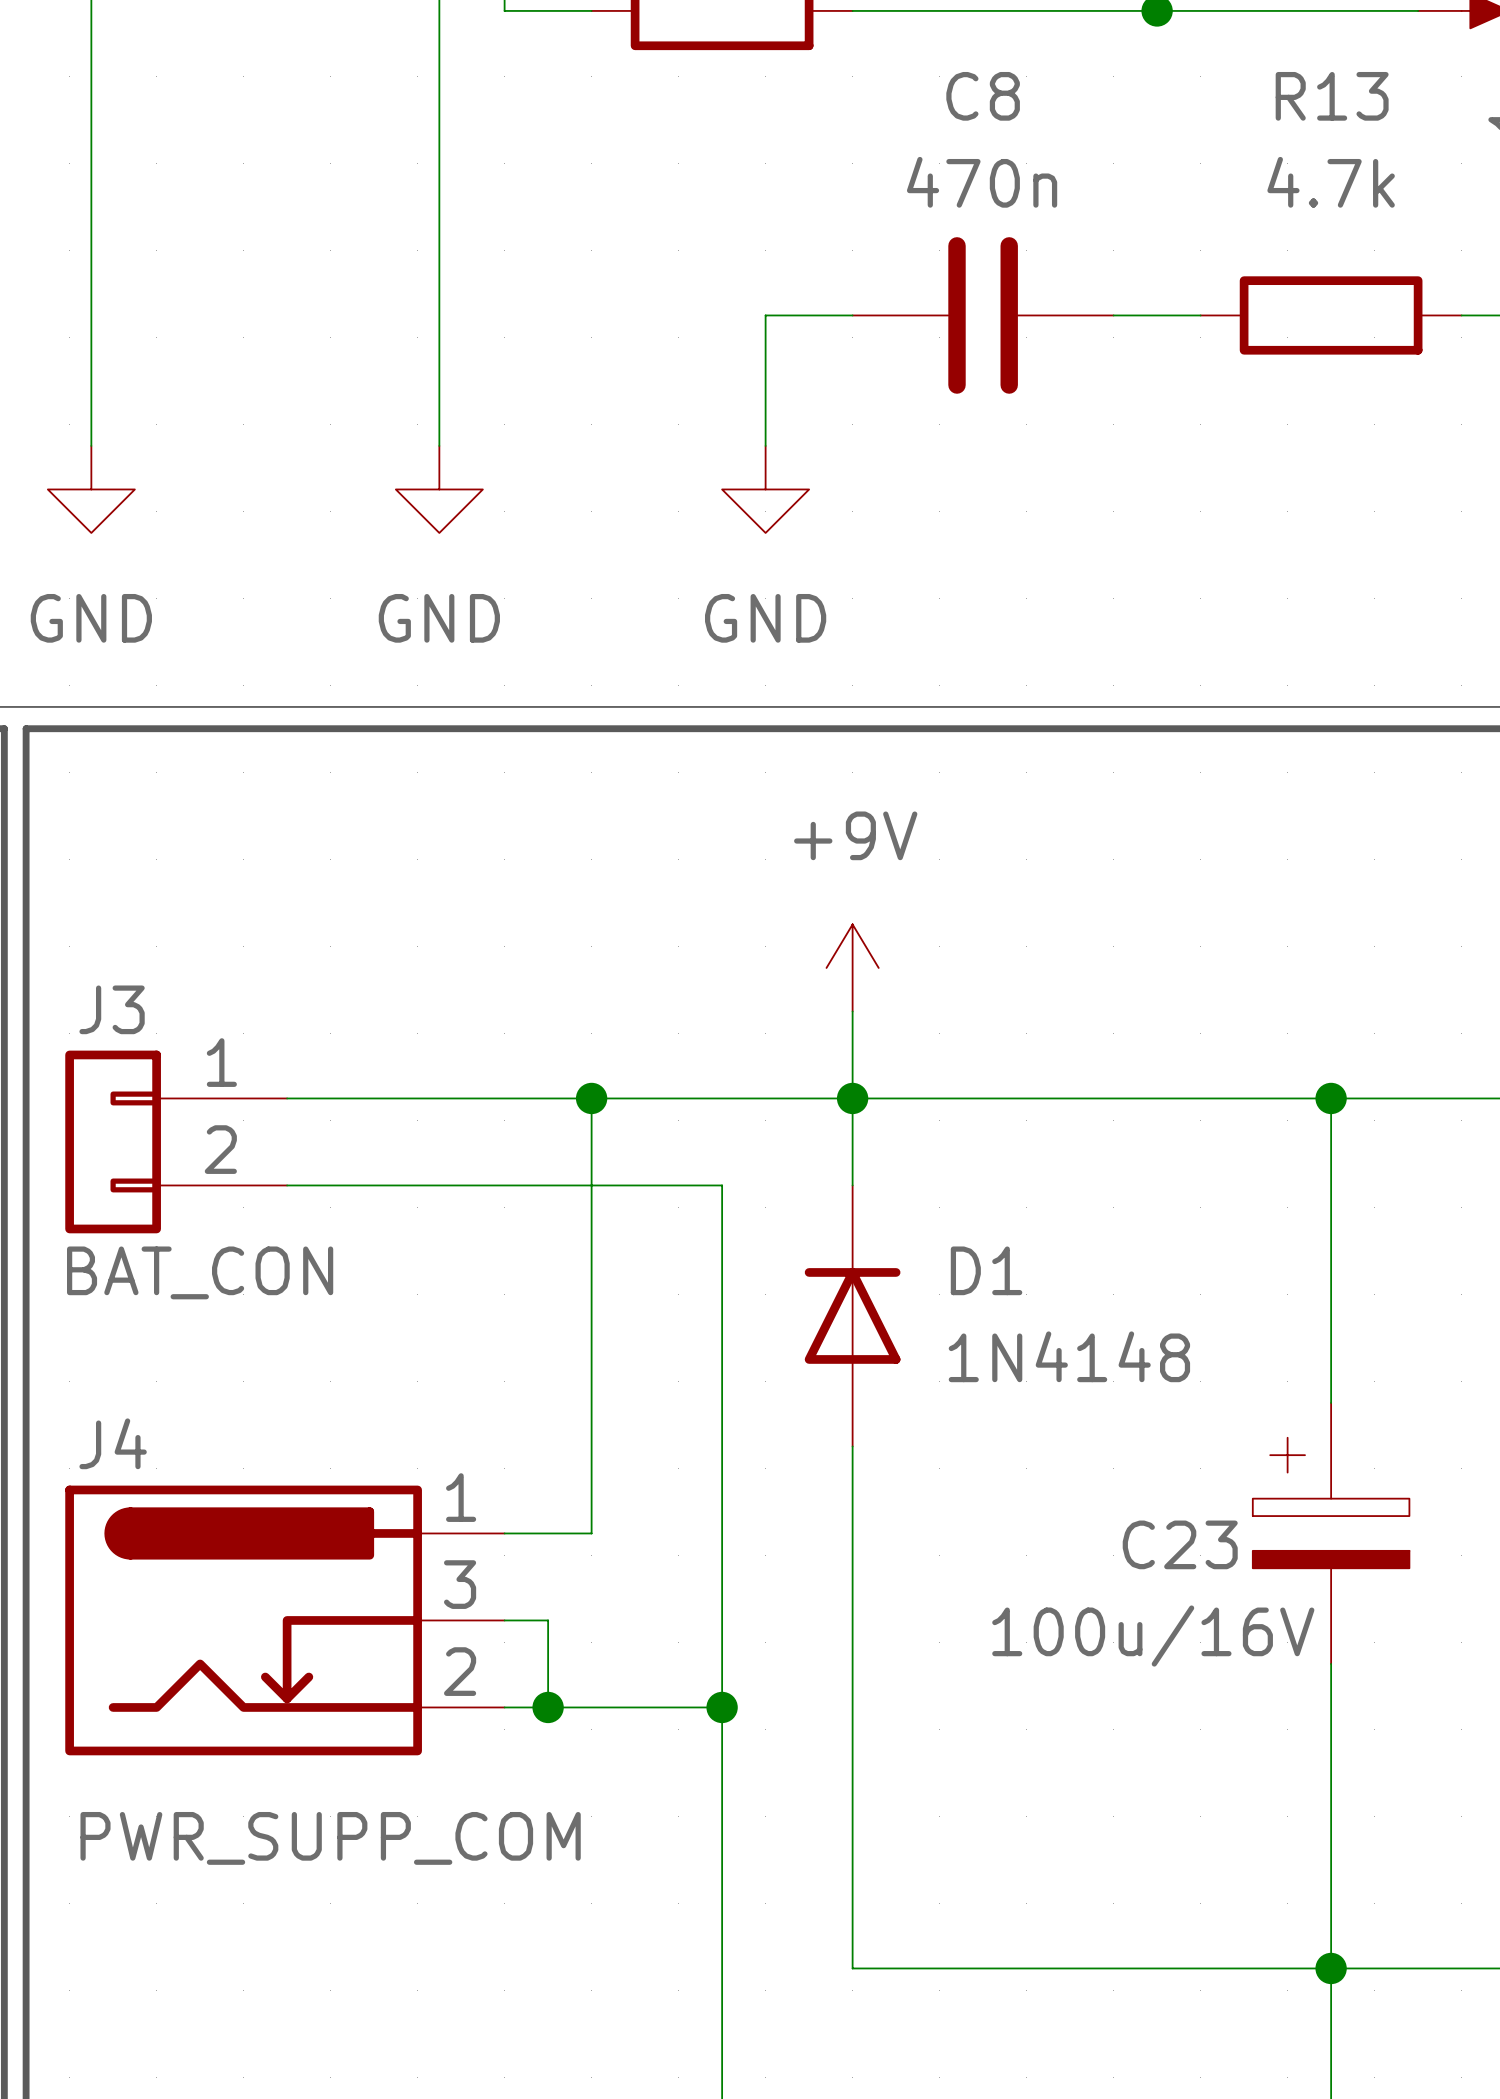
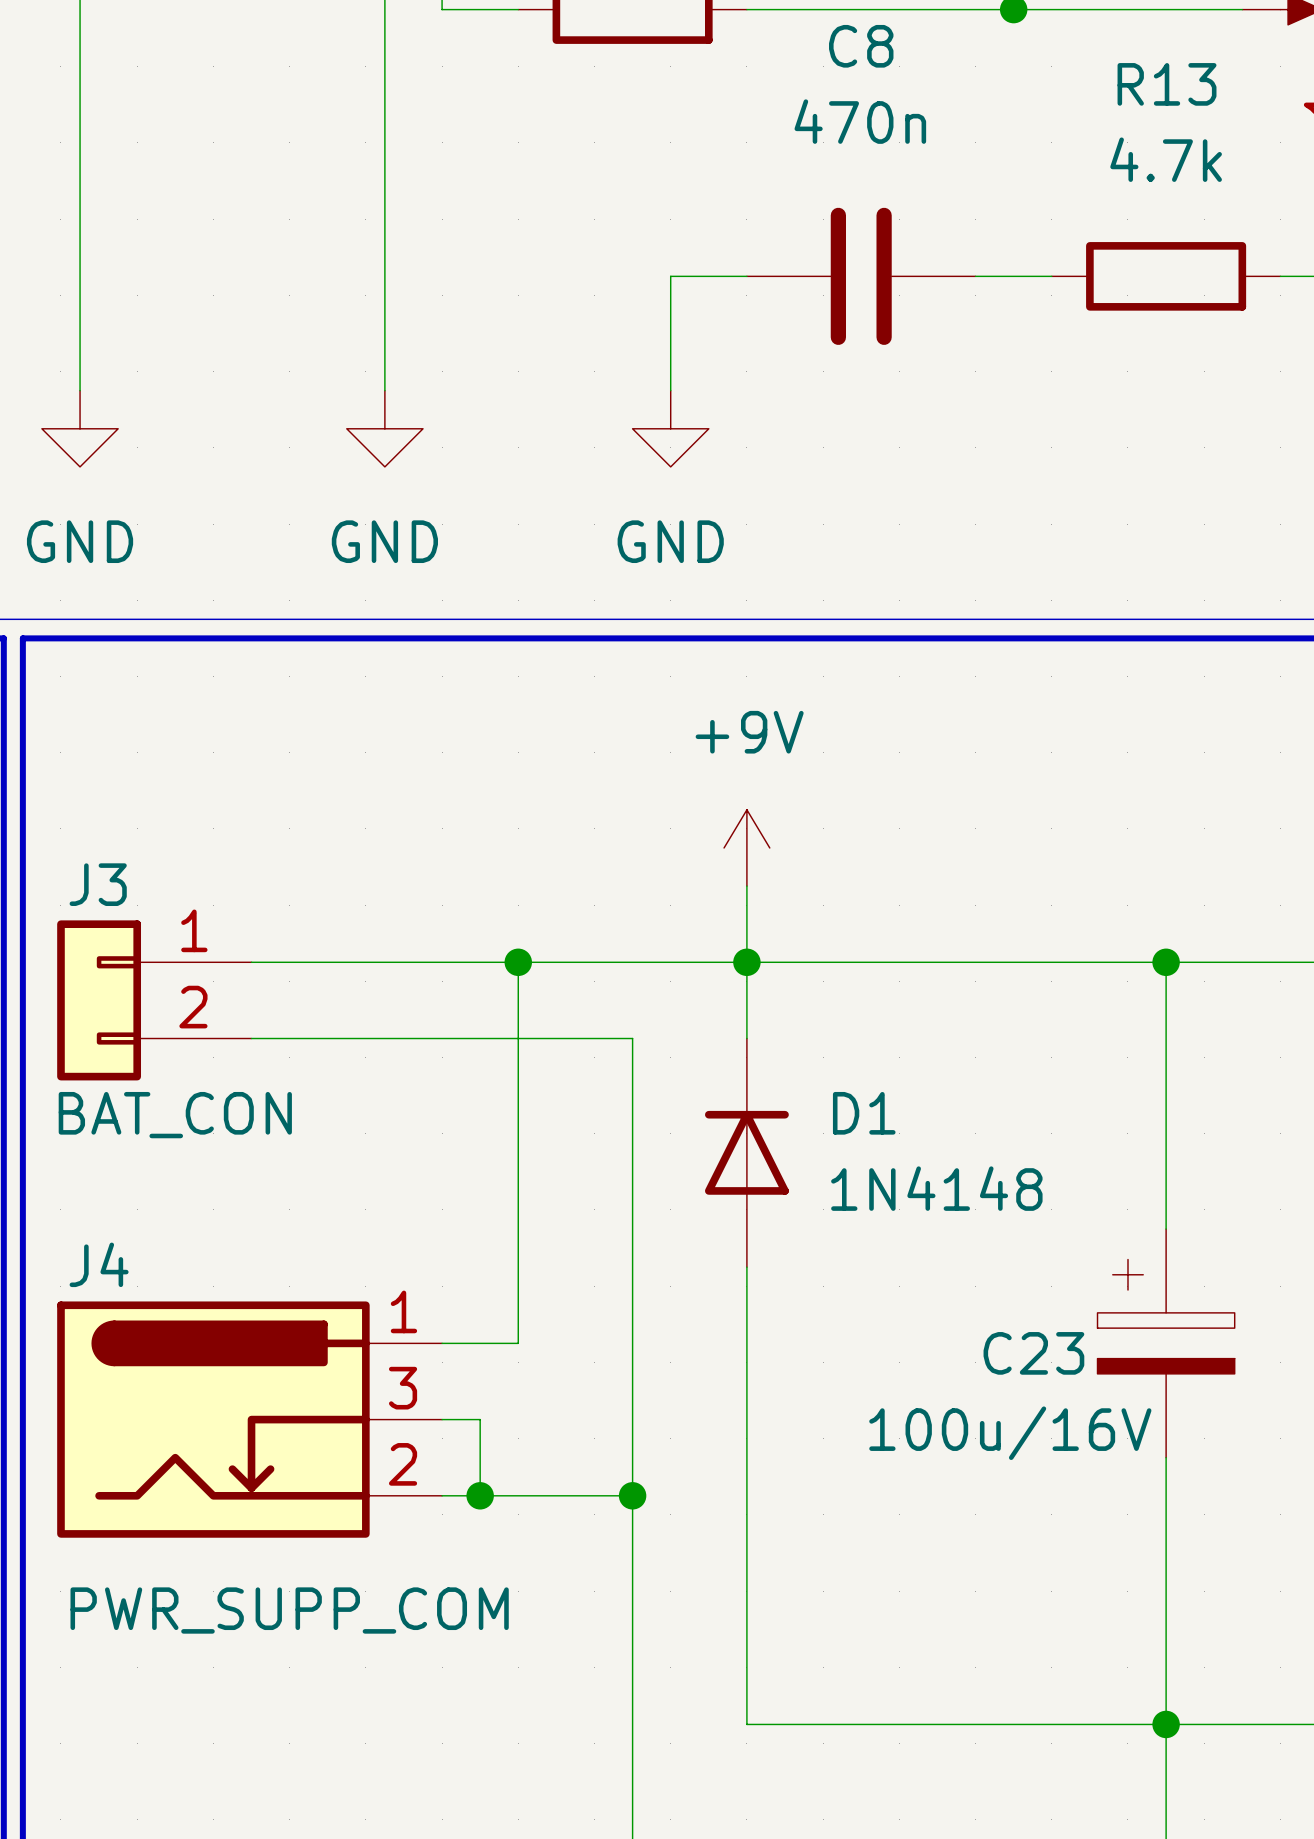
C8 name position: C8 (983, 96) -> C8 (861, 46)
C8 value position: 470n (982, 182) -> 470n (860, 121)

